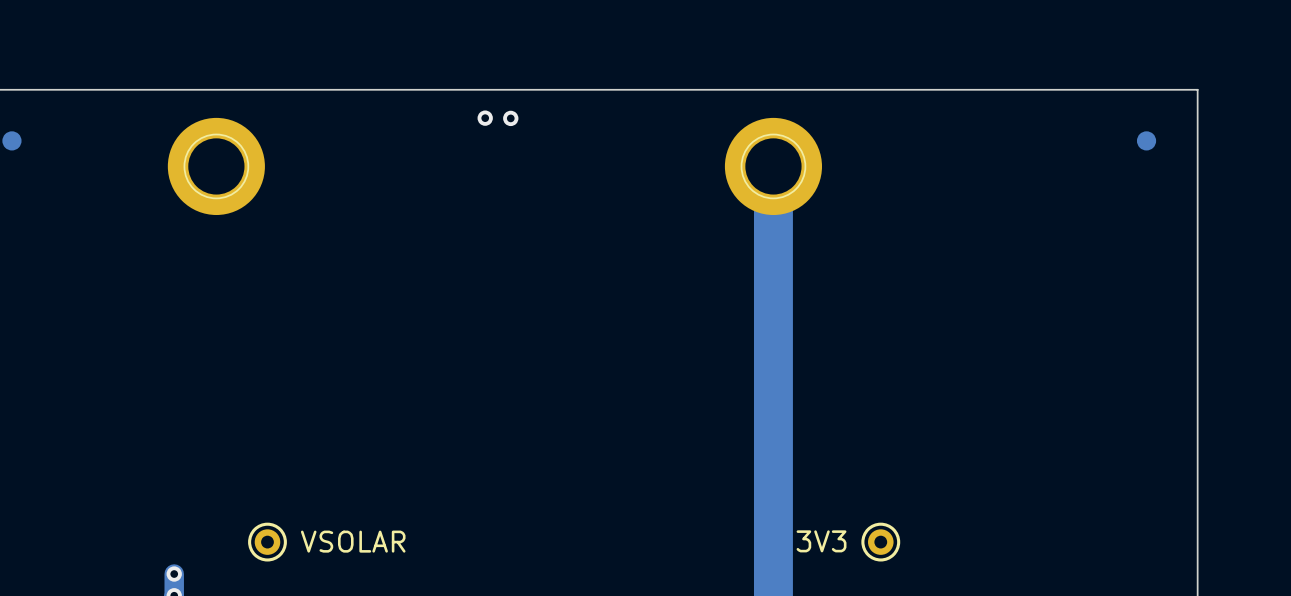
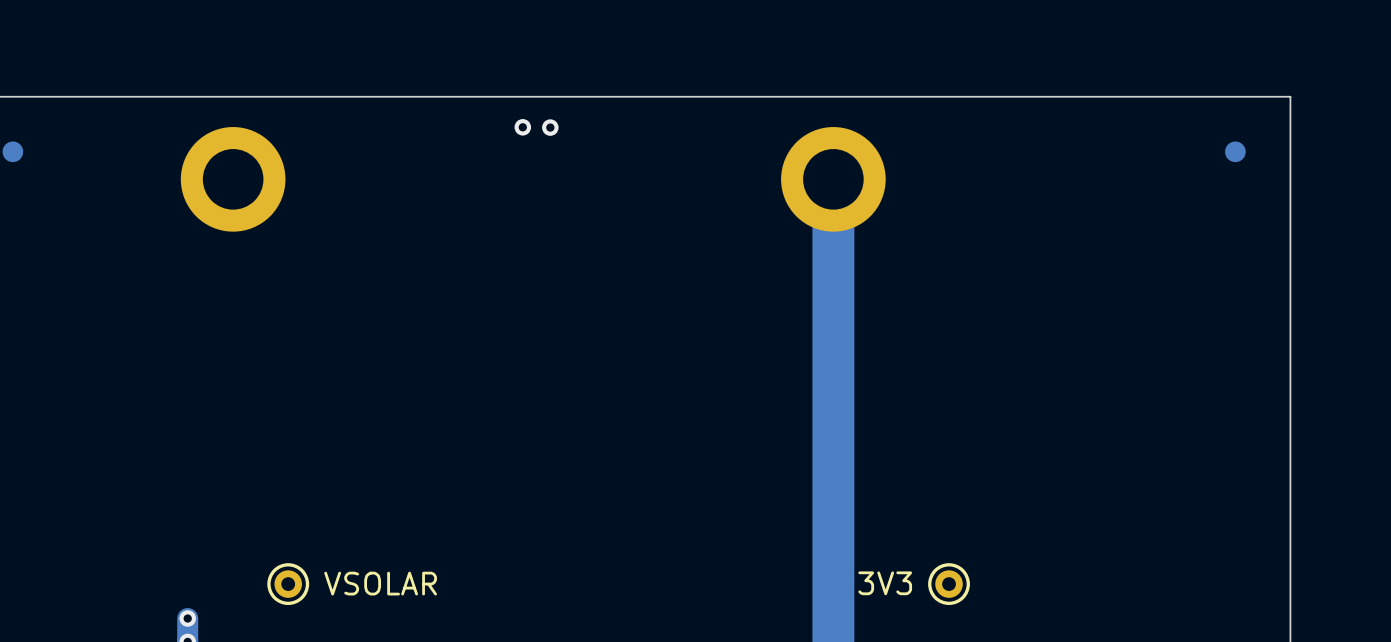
drawing: [184, 134, 249, 199] -> none
drawing: [741, 134, 806, 199] -> none

